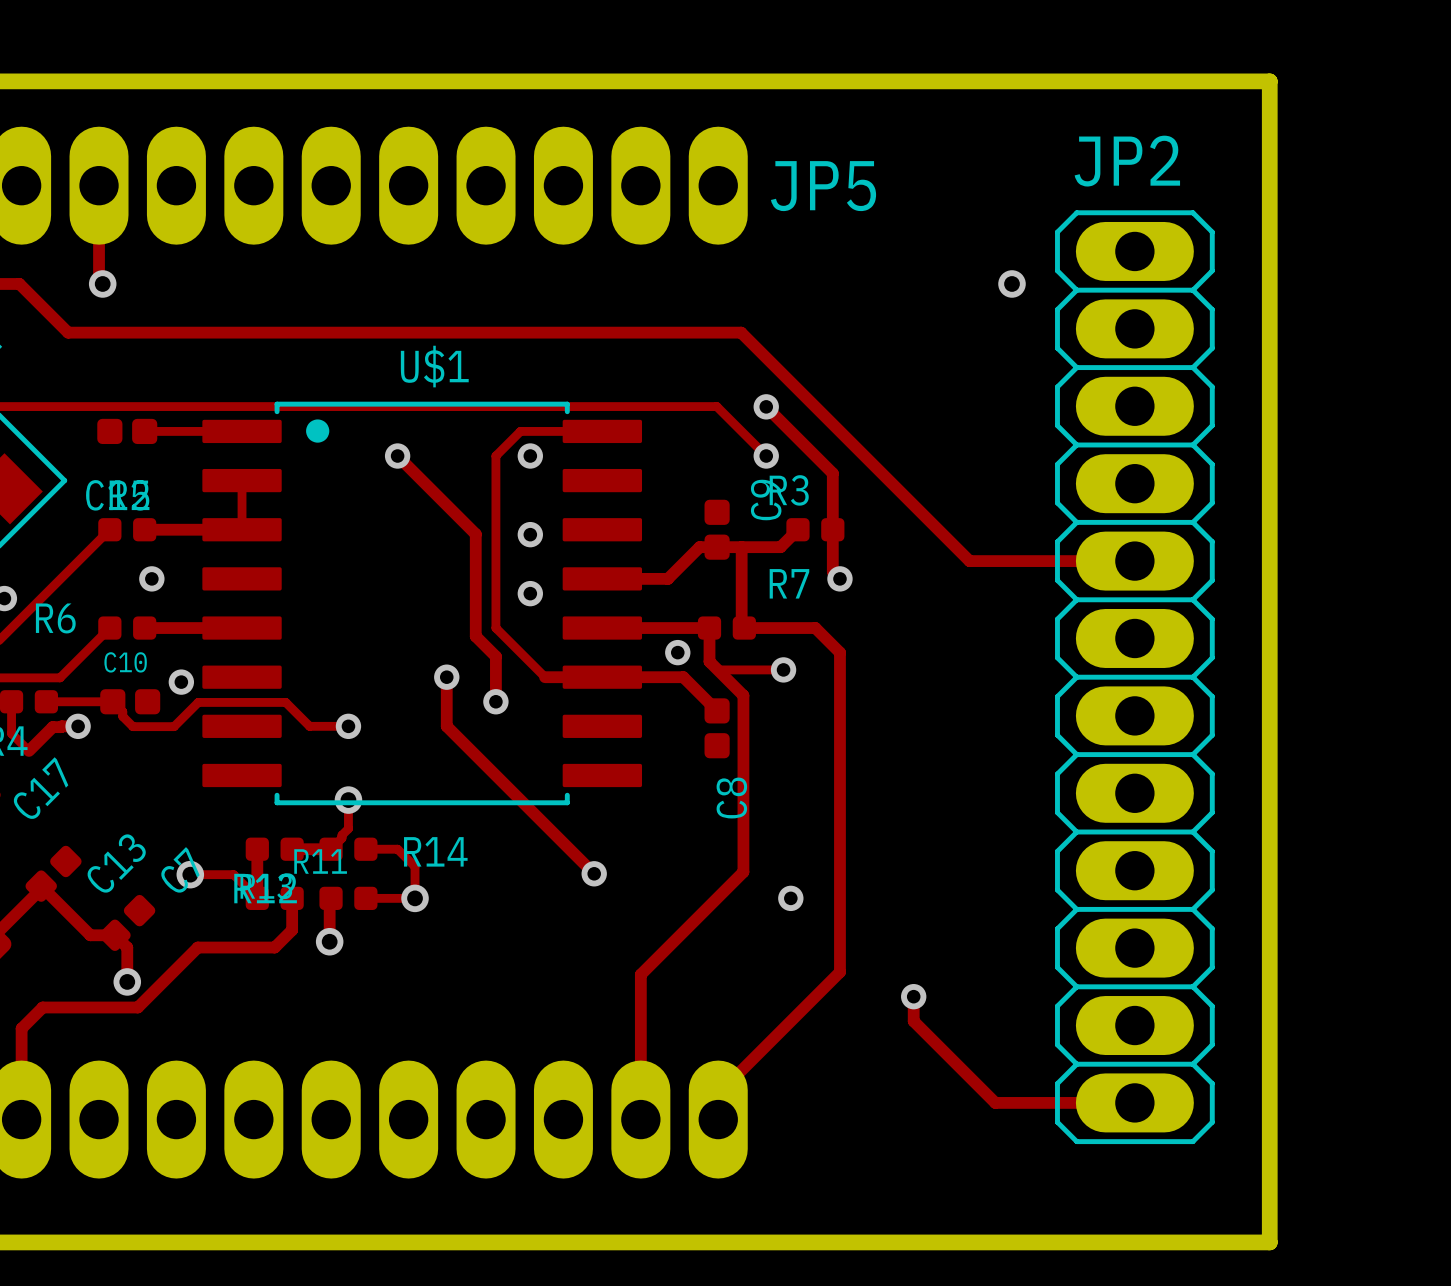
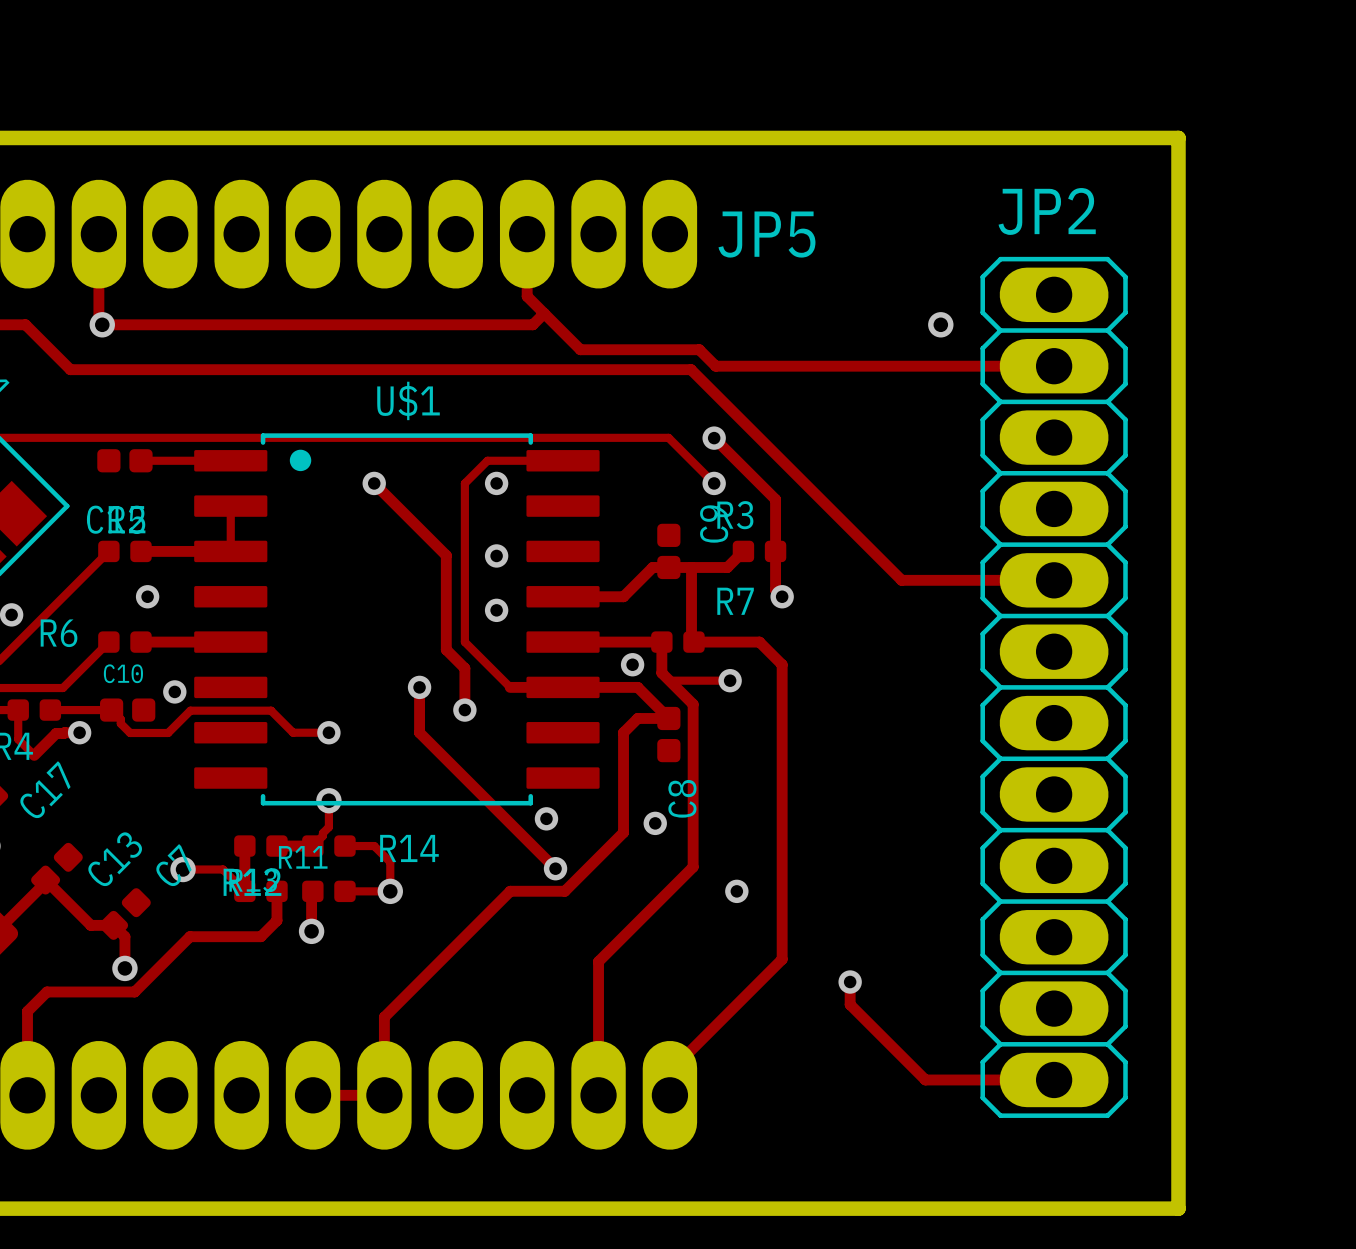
track: none -> (527, 234) (527, 296) (580, 349) (699, 349) (715, 366) (1054, 366)
track: none -> (544, 313) (532, 324) (102, 324)
track: none -> (668, 718) (637, 718) (623, 732) (623, 832) (564, 891) (510, 891) (384, 1017) (384, 1095) (313, 1095)
via: none -> (546, 818)
via: none -> (655, 823)

